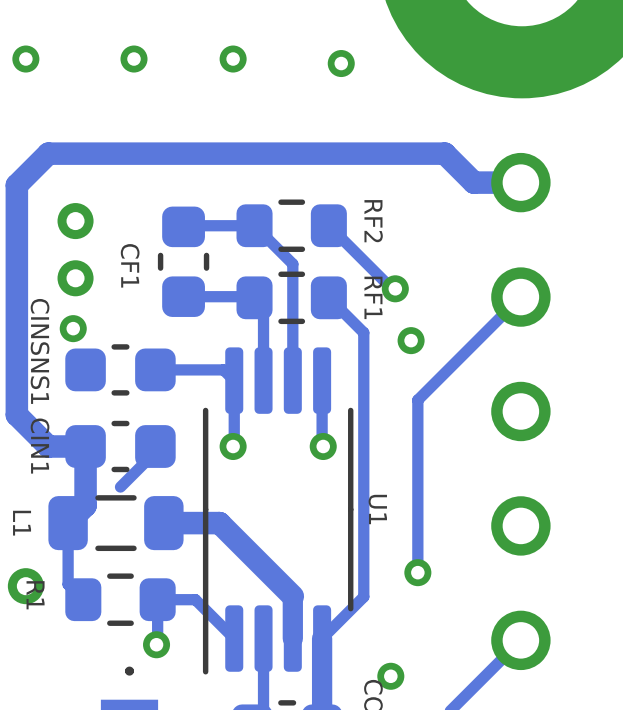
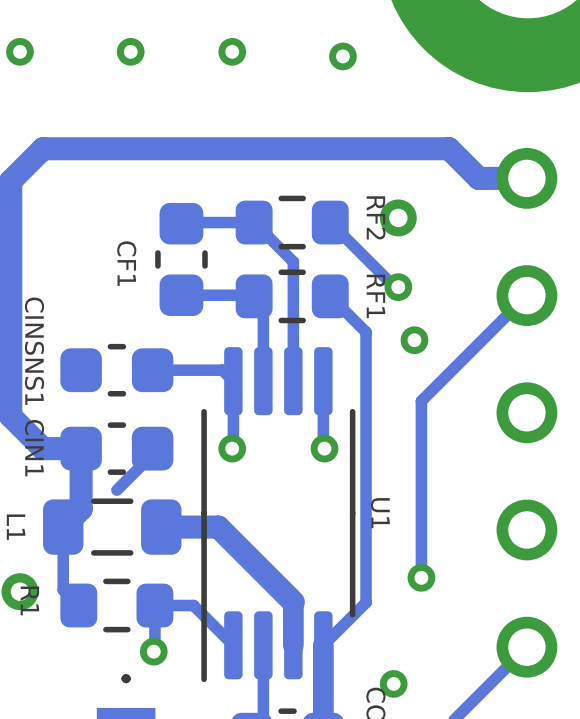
via: (75, 221) -> none
via: none -> (398, 217)
via: (75, 278) -> none
via: (73, 328) -> none

